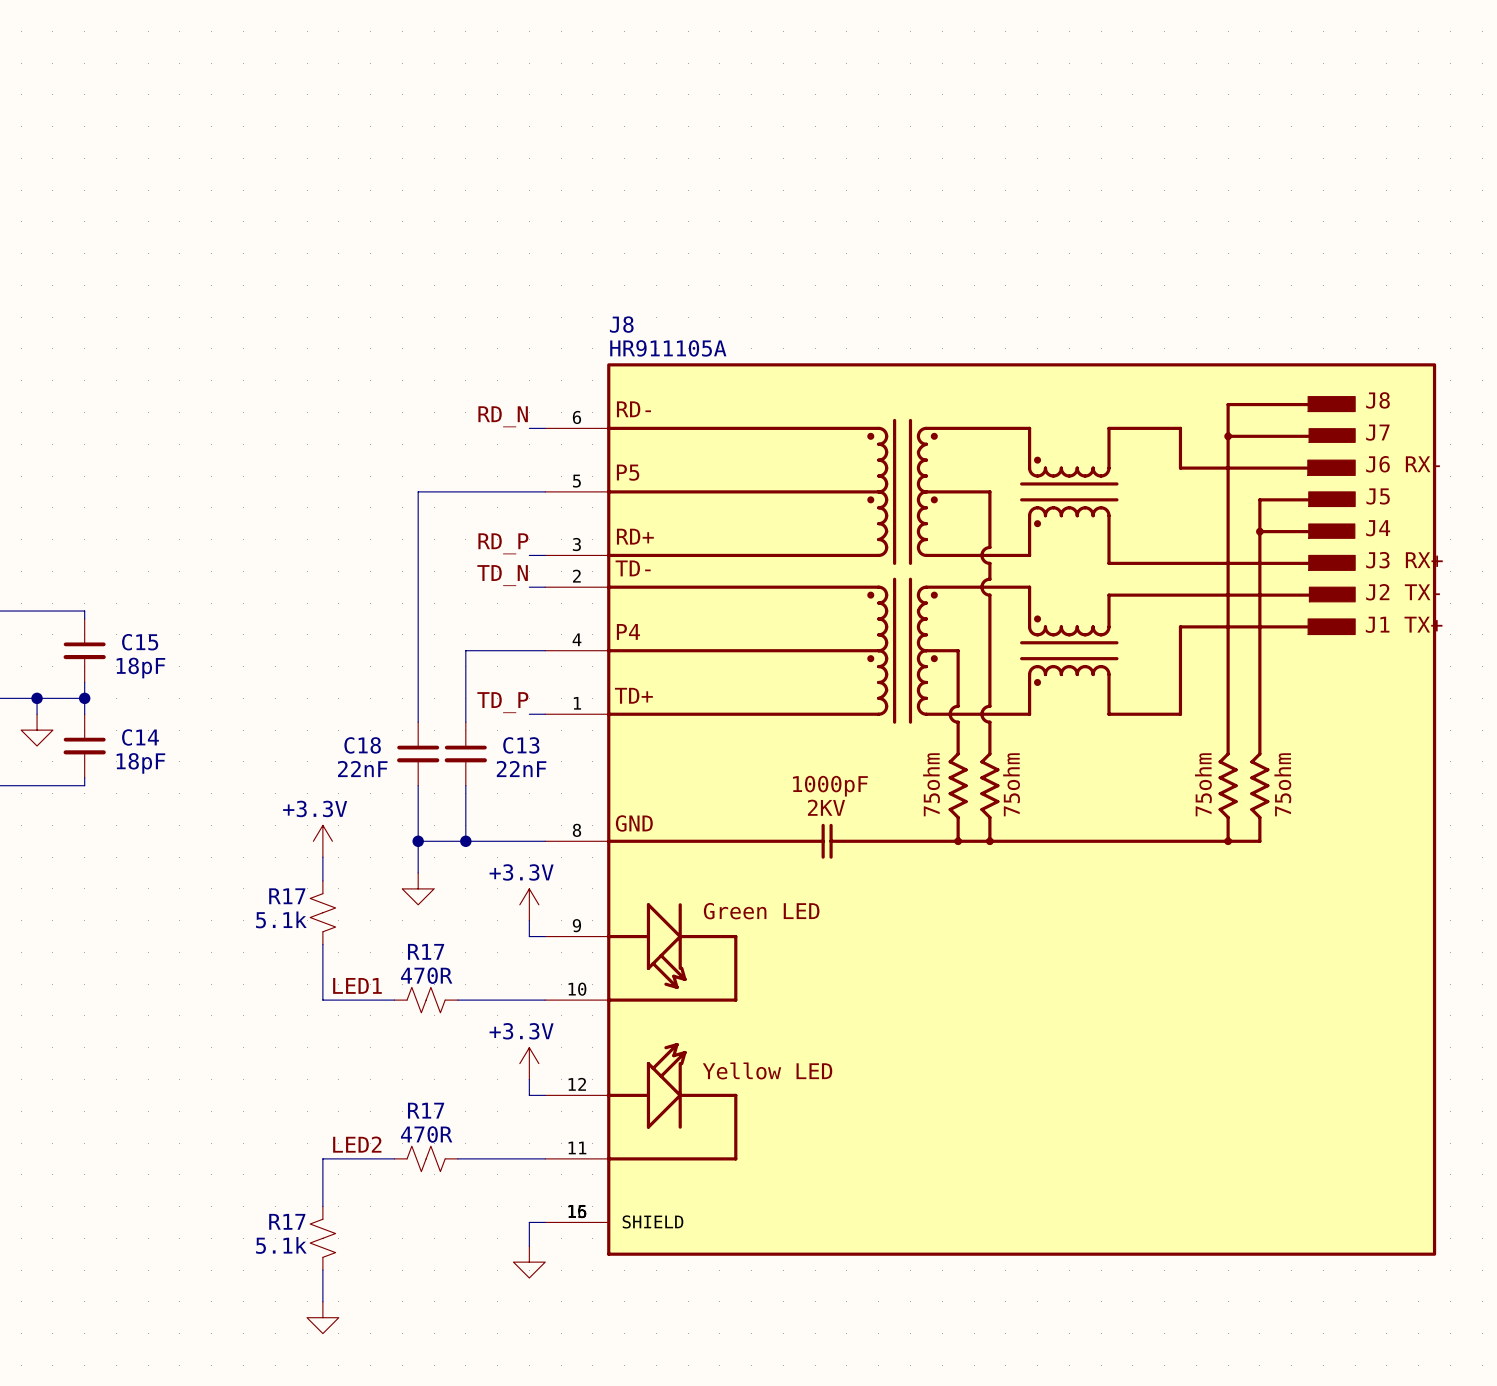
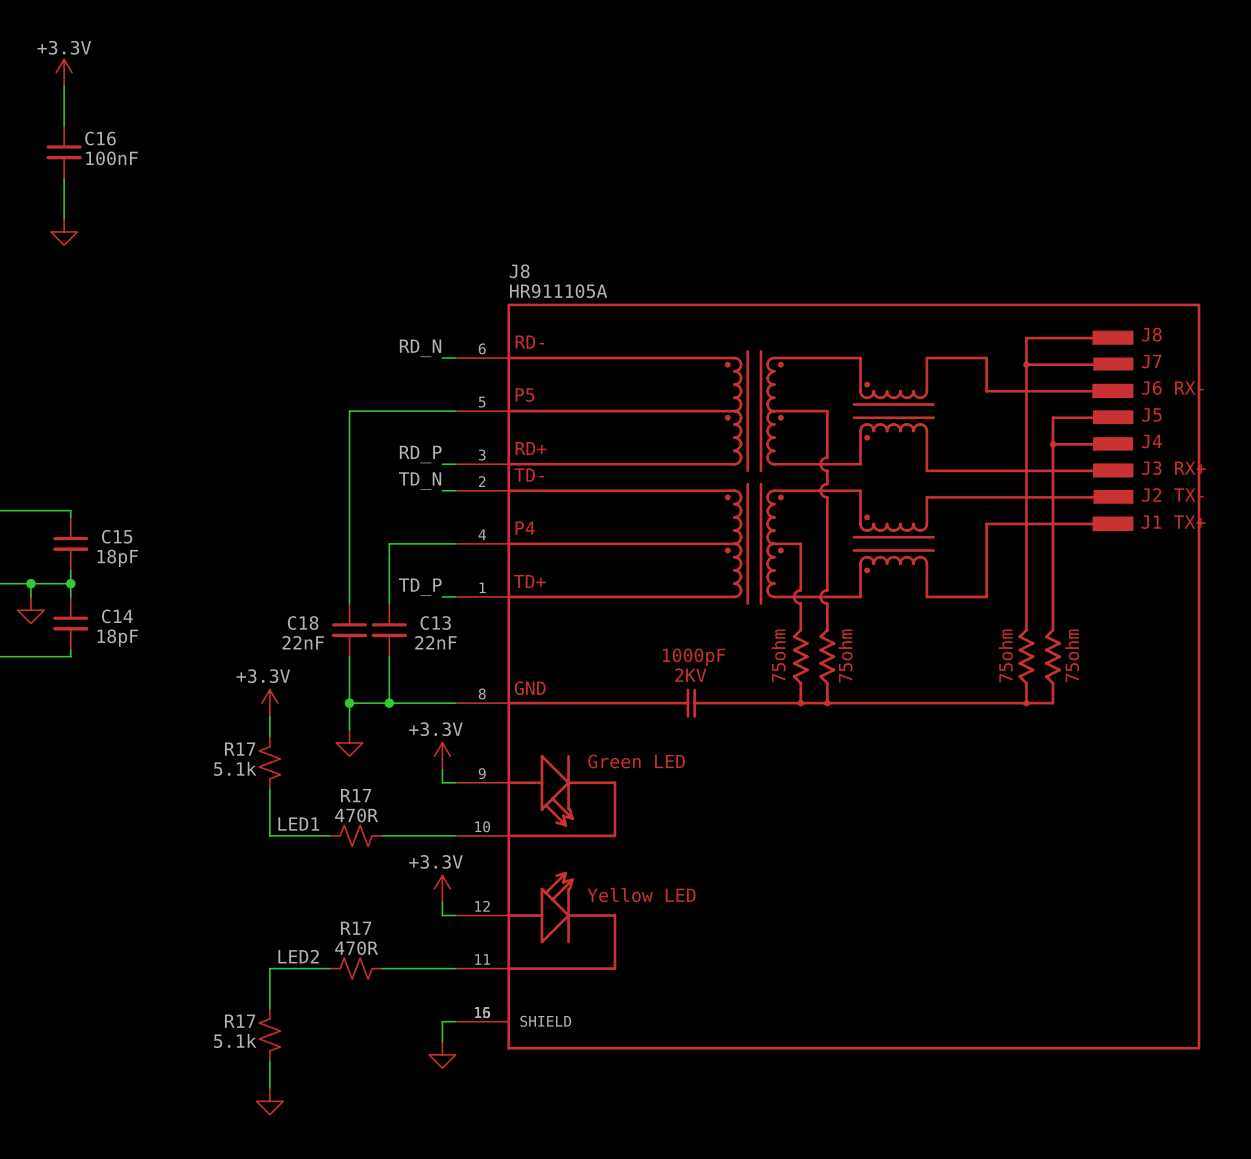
power symbol: none -> +3.3V (64, 72)
wire: none -> (64, 85) (64, 125)
C16: none -> 100nF (64, 152)
wire: none -> (64, 178) (64, 218)
power symbol: none -> (64, 231)

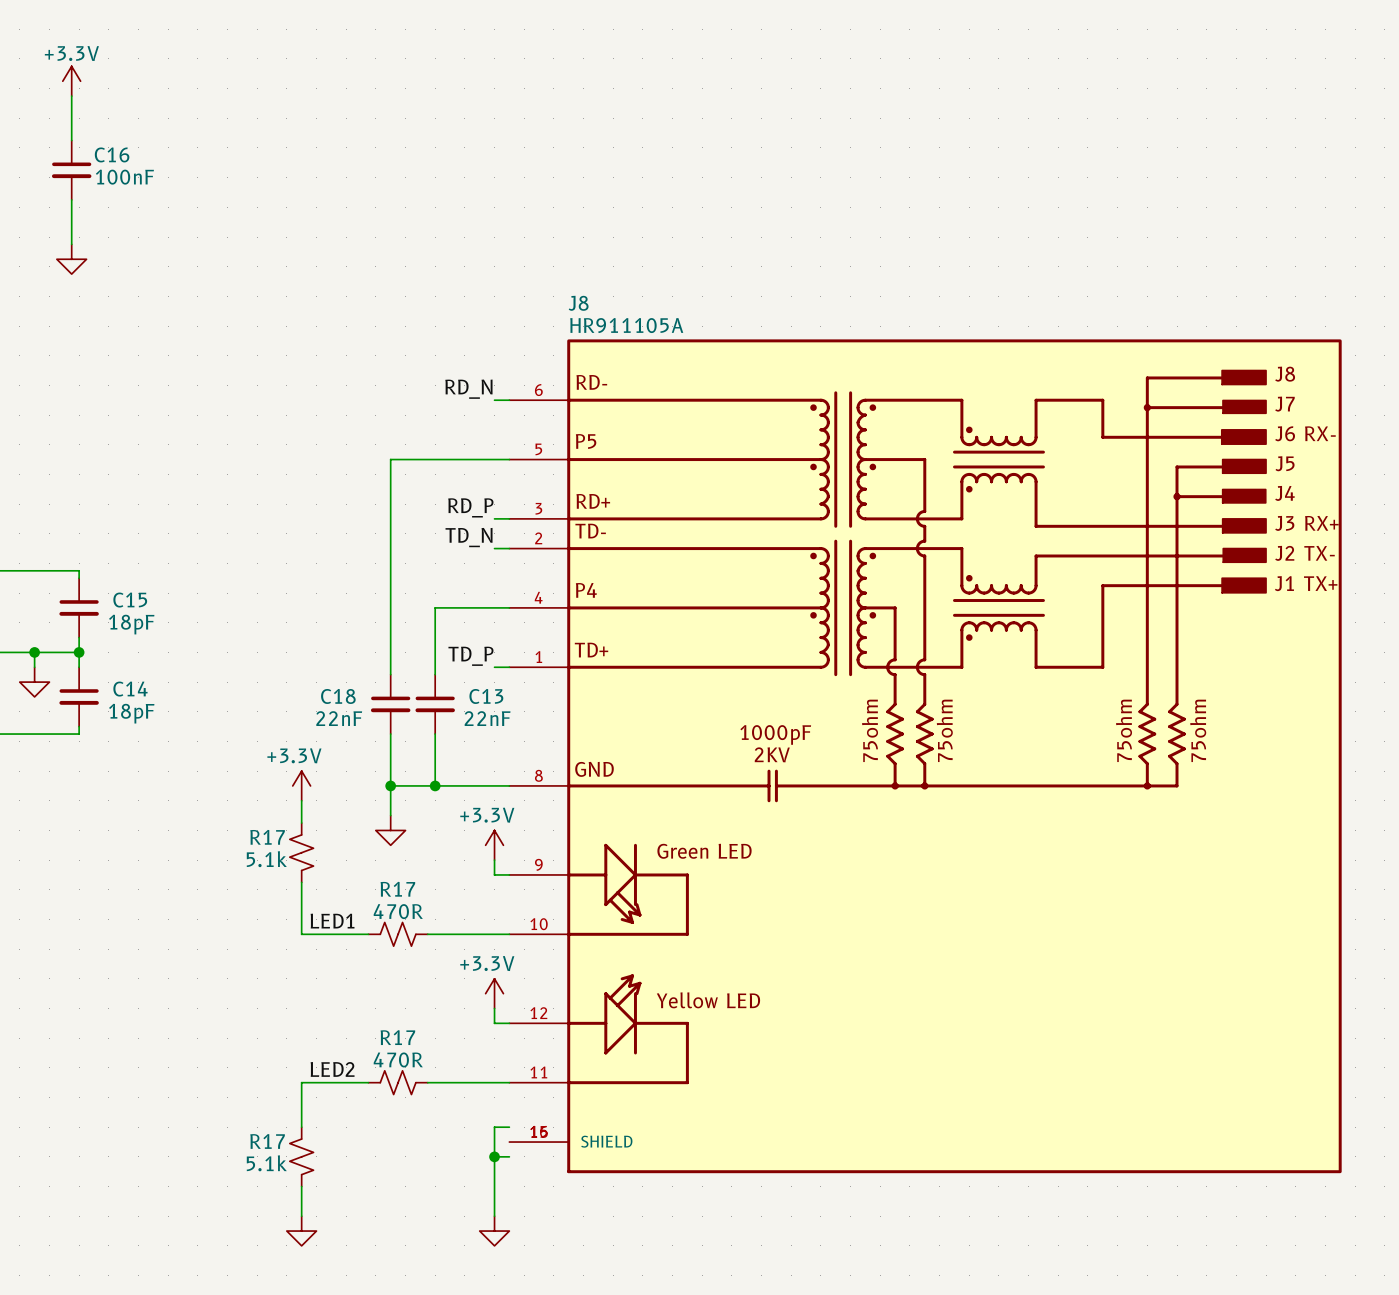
wire: (442, 1021) (455, 1021) -> (494, 1142) (494, 1127) (509, 1127)
wire: none -> (494, 1156) (509, 1156)
junction: none -> (494, 1156)
wire: none -> (494, 1164) (494, 1216)
power symbol position: (442, 1054) -> (494, 1231)

